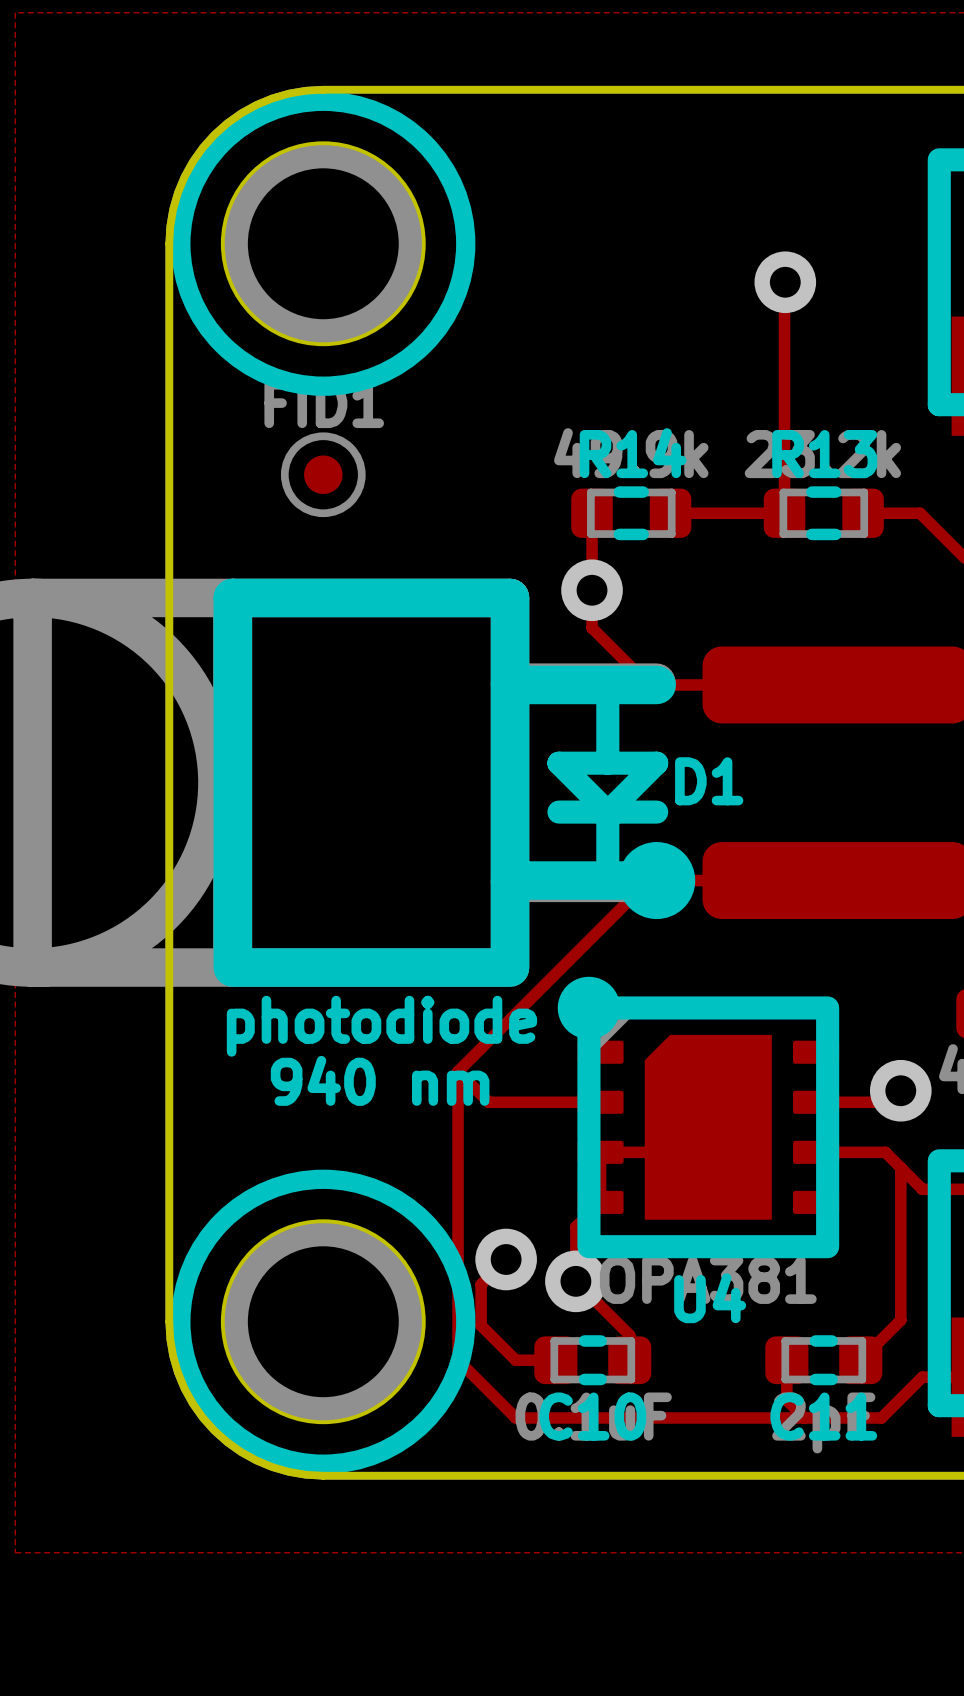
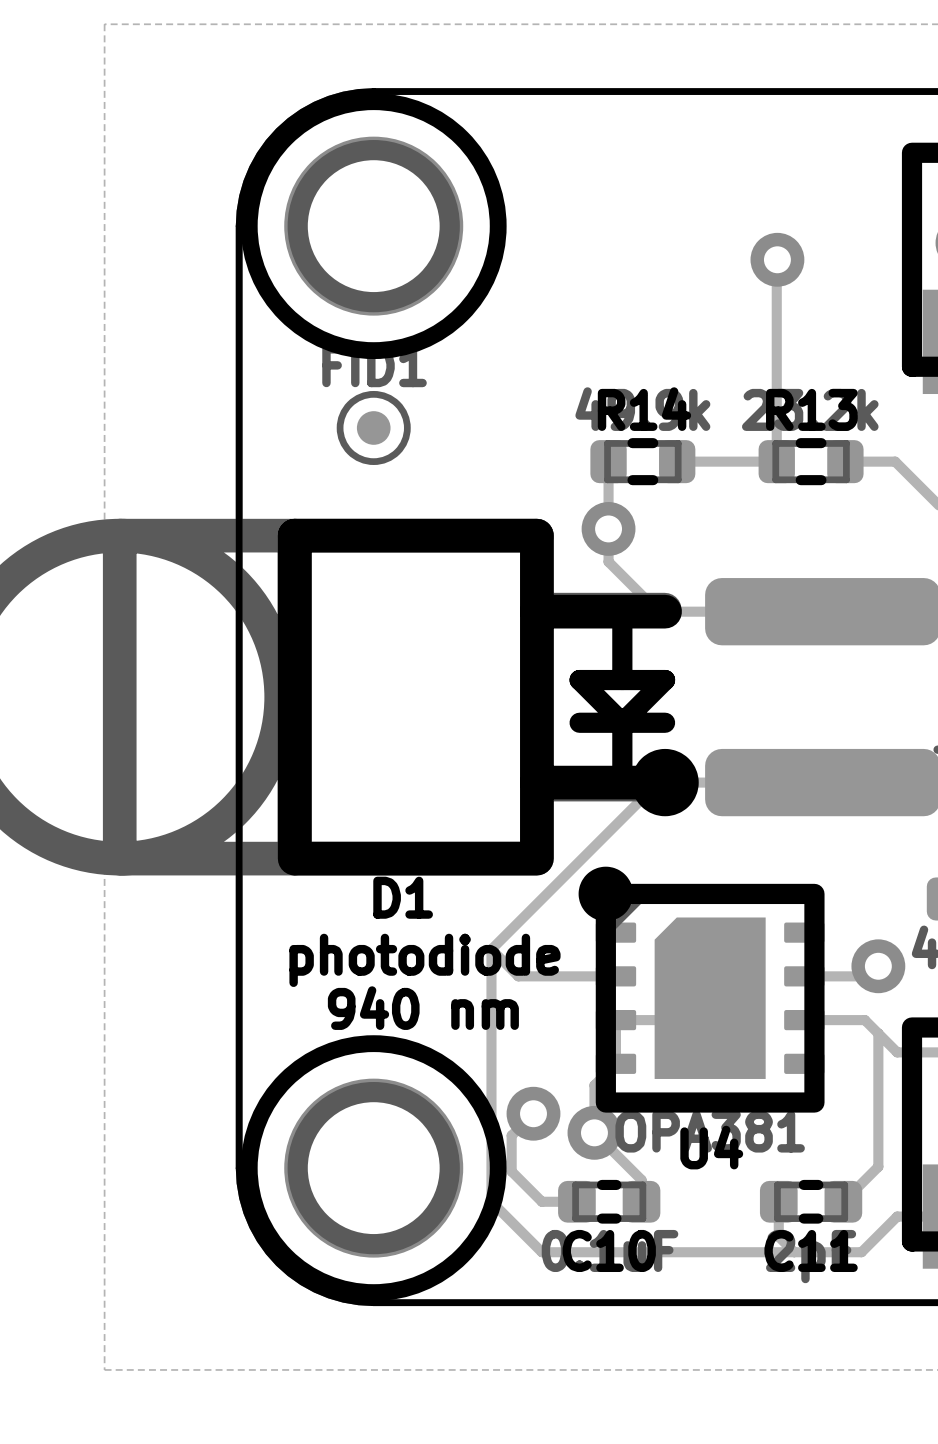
D1 name position: D1 (709, 781) -> D1 (403, 897)
text position: photodiode (381, 1026) -> photodiode (424, 960)
text position: 940 nm (380, 1080) -> 940 nm (423, 1008)

